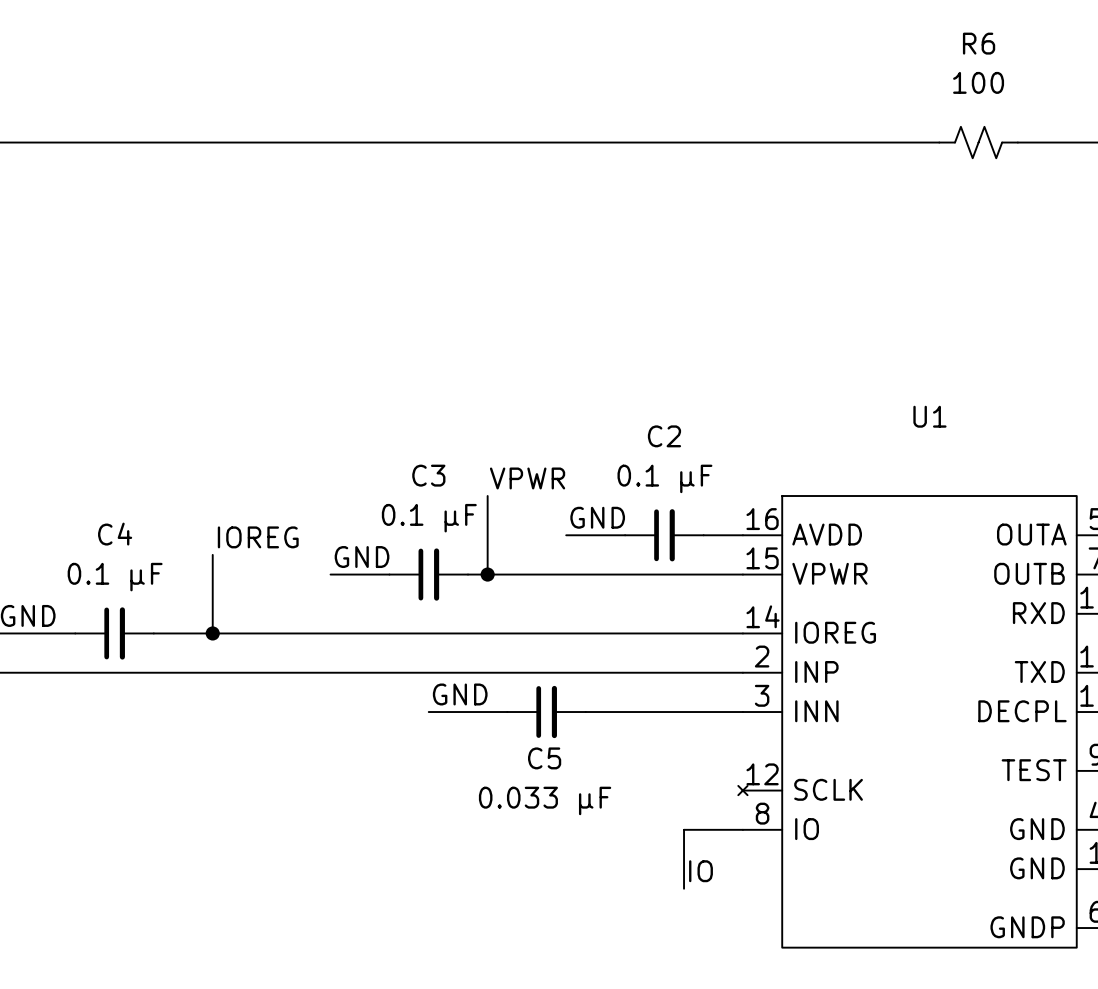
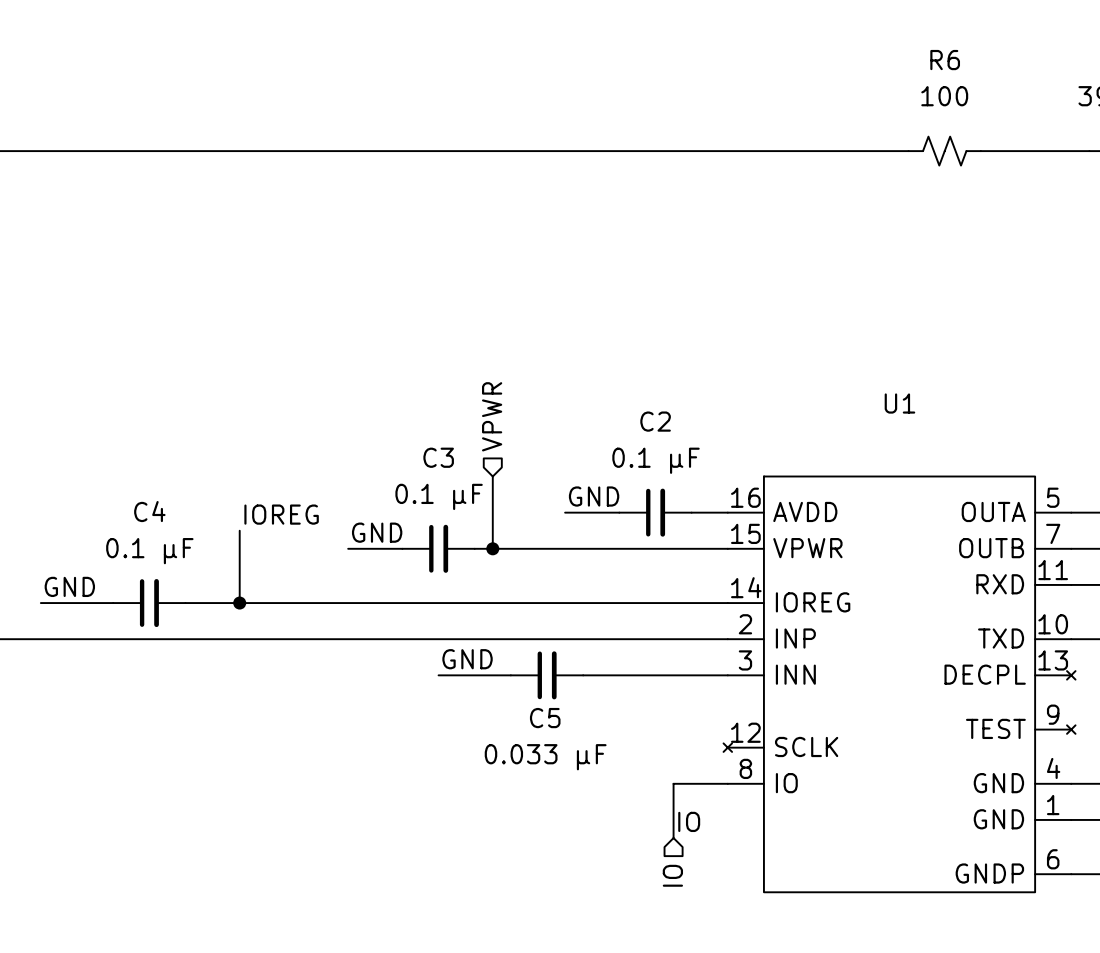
hierarchical label: none -> VPWR (492, 416)
label: VPWR (527, 478) -> none
hierarchical label: none -> IO (672, 875)

